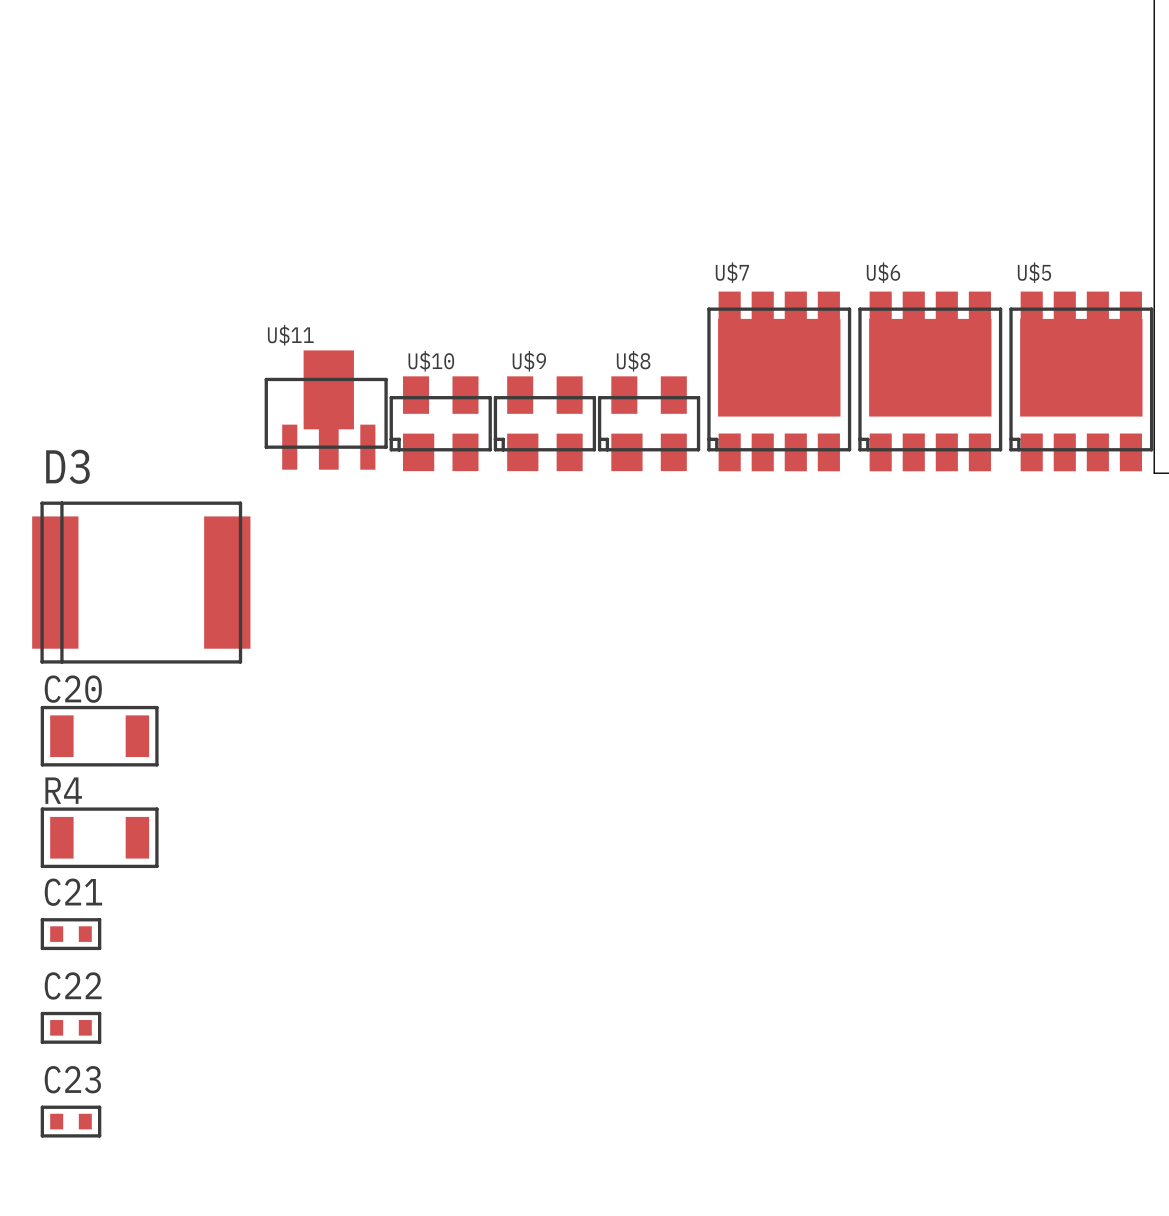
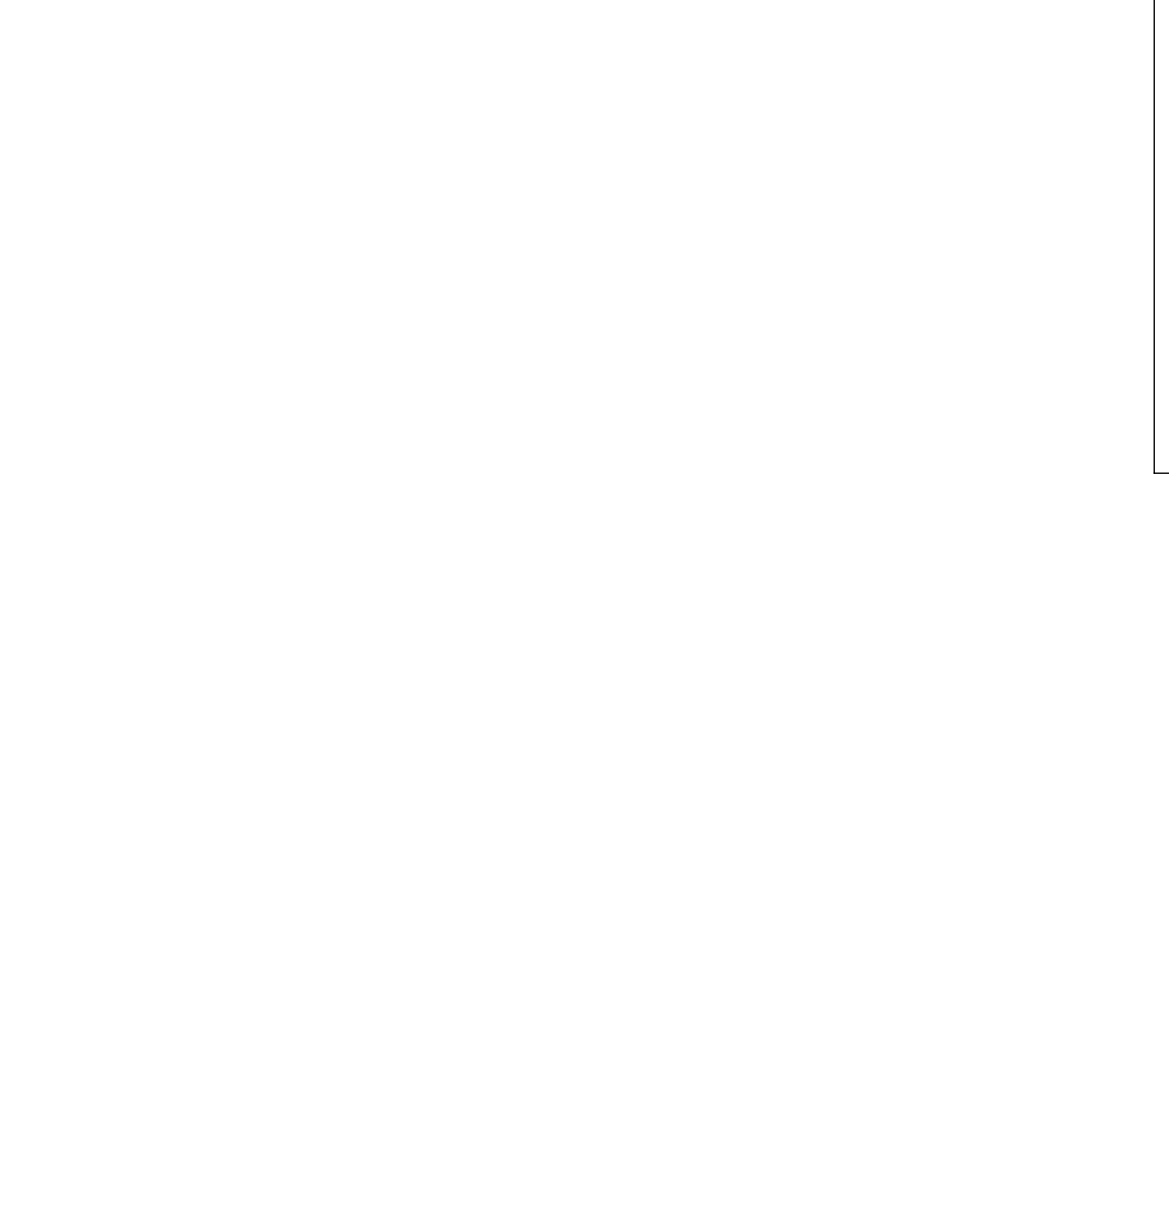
U$7: (779, 381) -> none
U$6: (930, 381) -> none
U$5: (1081, 381) -> none
U$11: (326, 410) -> none
U$10: (440, 423) -> none
U$9: (544, 423) -> none
U$8: (649, 423) -> none
D3: (141, 582) -> none
C20: (99, 736) -> none
R4: (99, 837) -> none
C21: (70, 934) -> none
C22: (70, 1027) -> none
C23: (70, 1121) -> none

